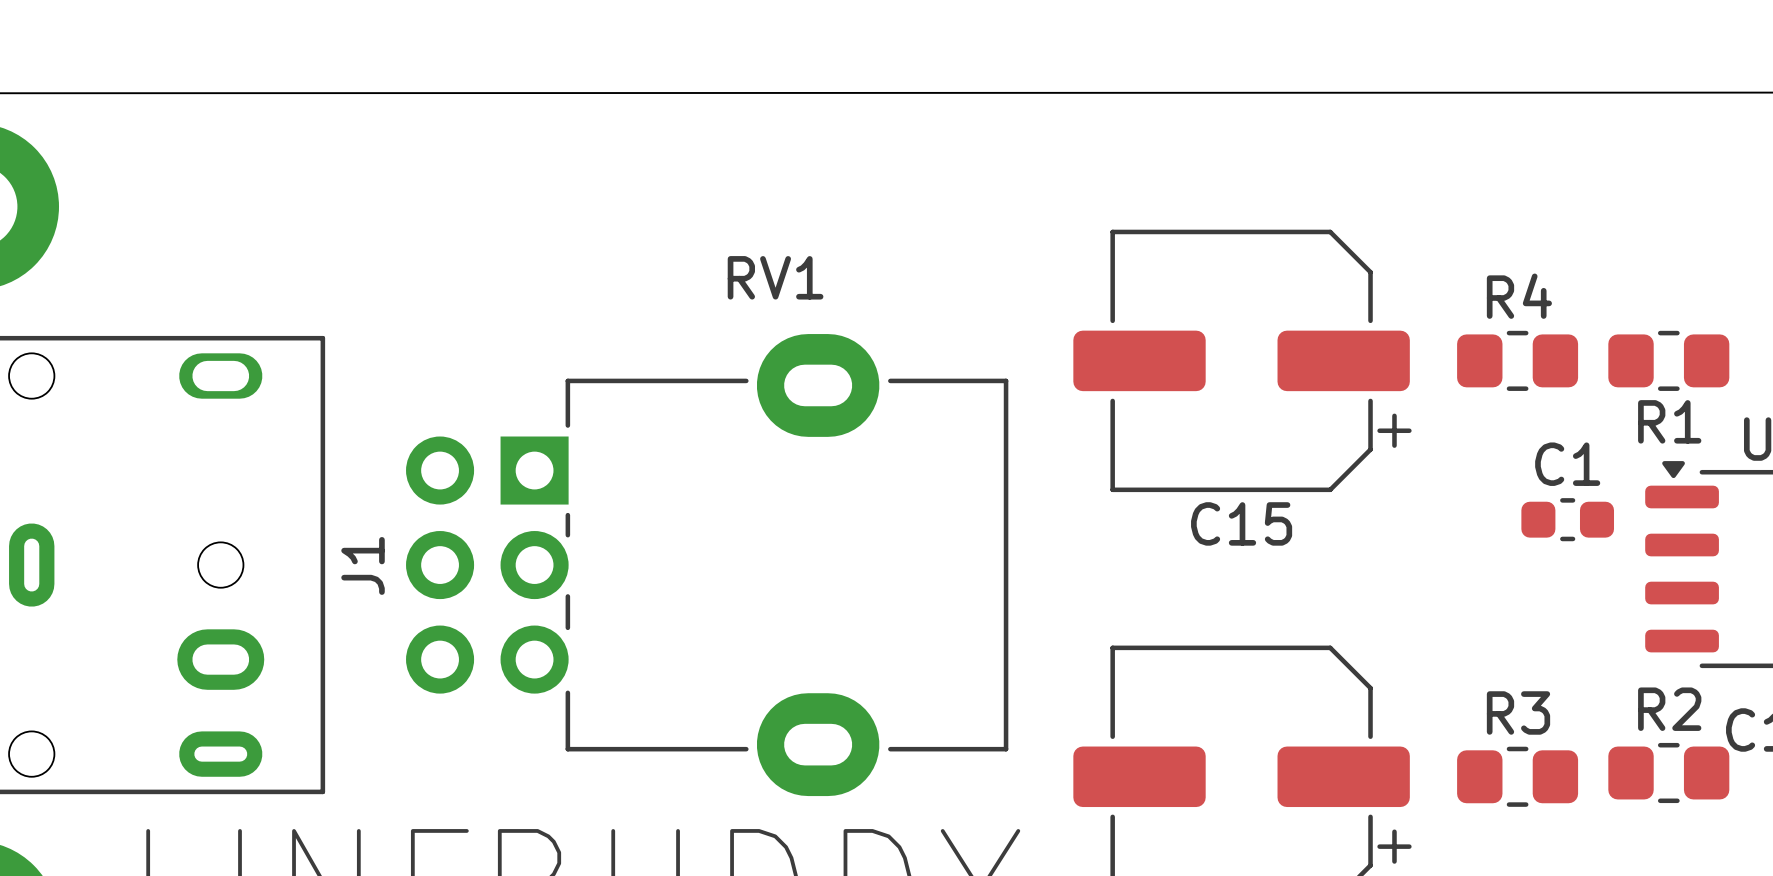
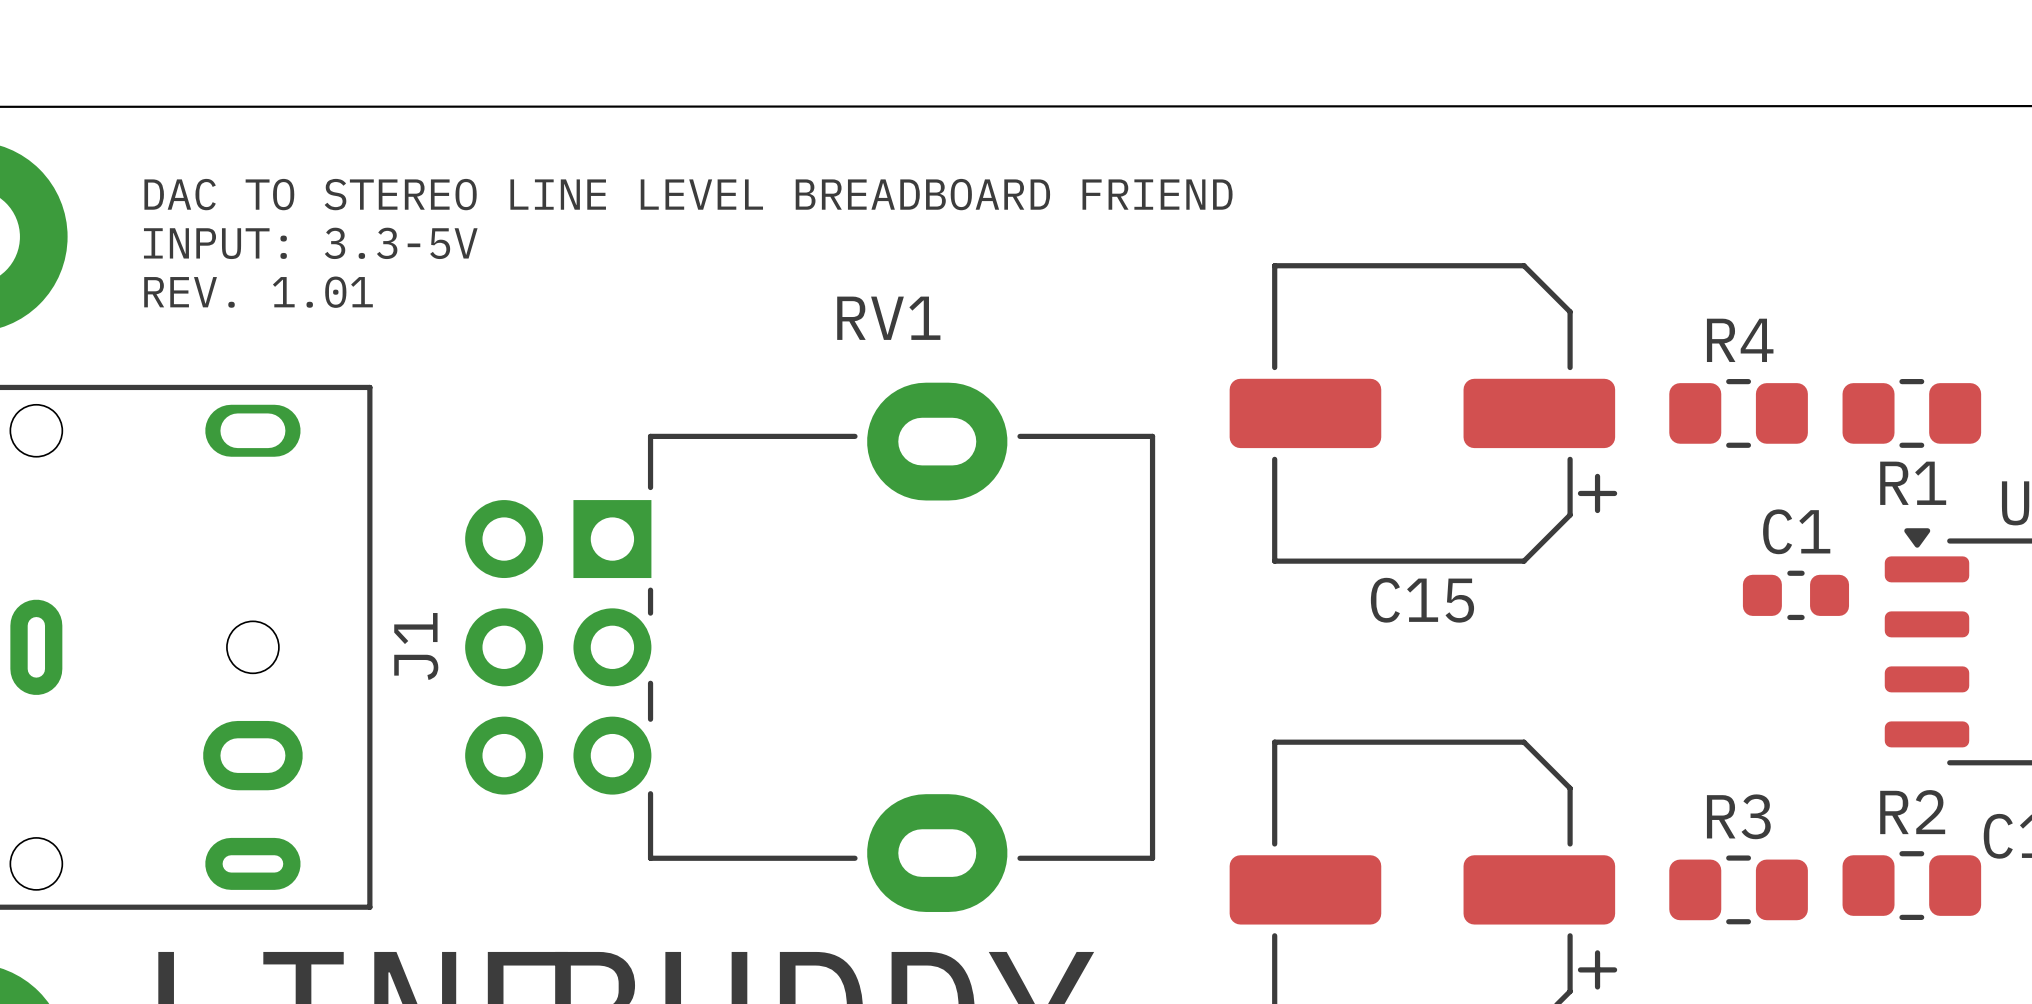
text: none -> DAC TO STEREO LINE LEVEL BREADBOARD FRIEND (688, 194)
text: none -> INPUT: 3.3-5V (310, 243)
text: none -> REV. 1.01 (258, 292)

